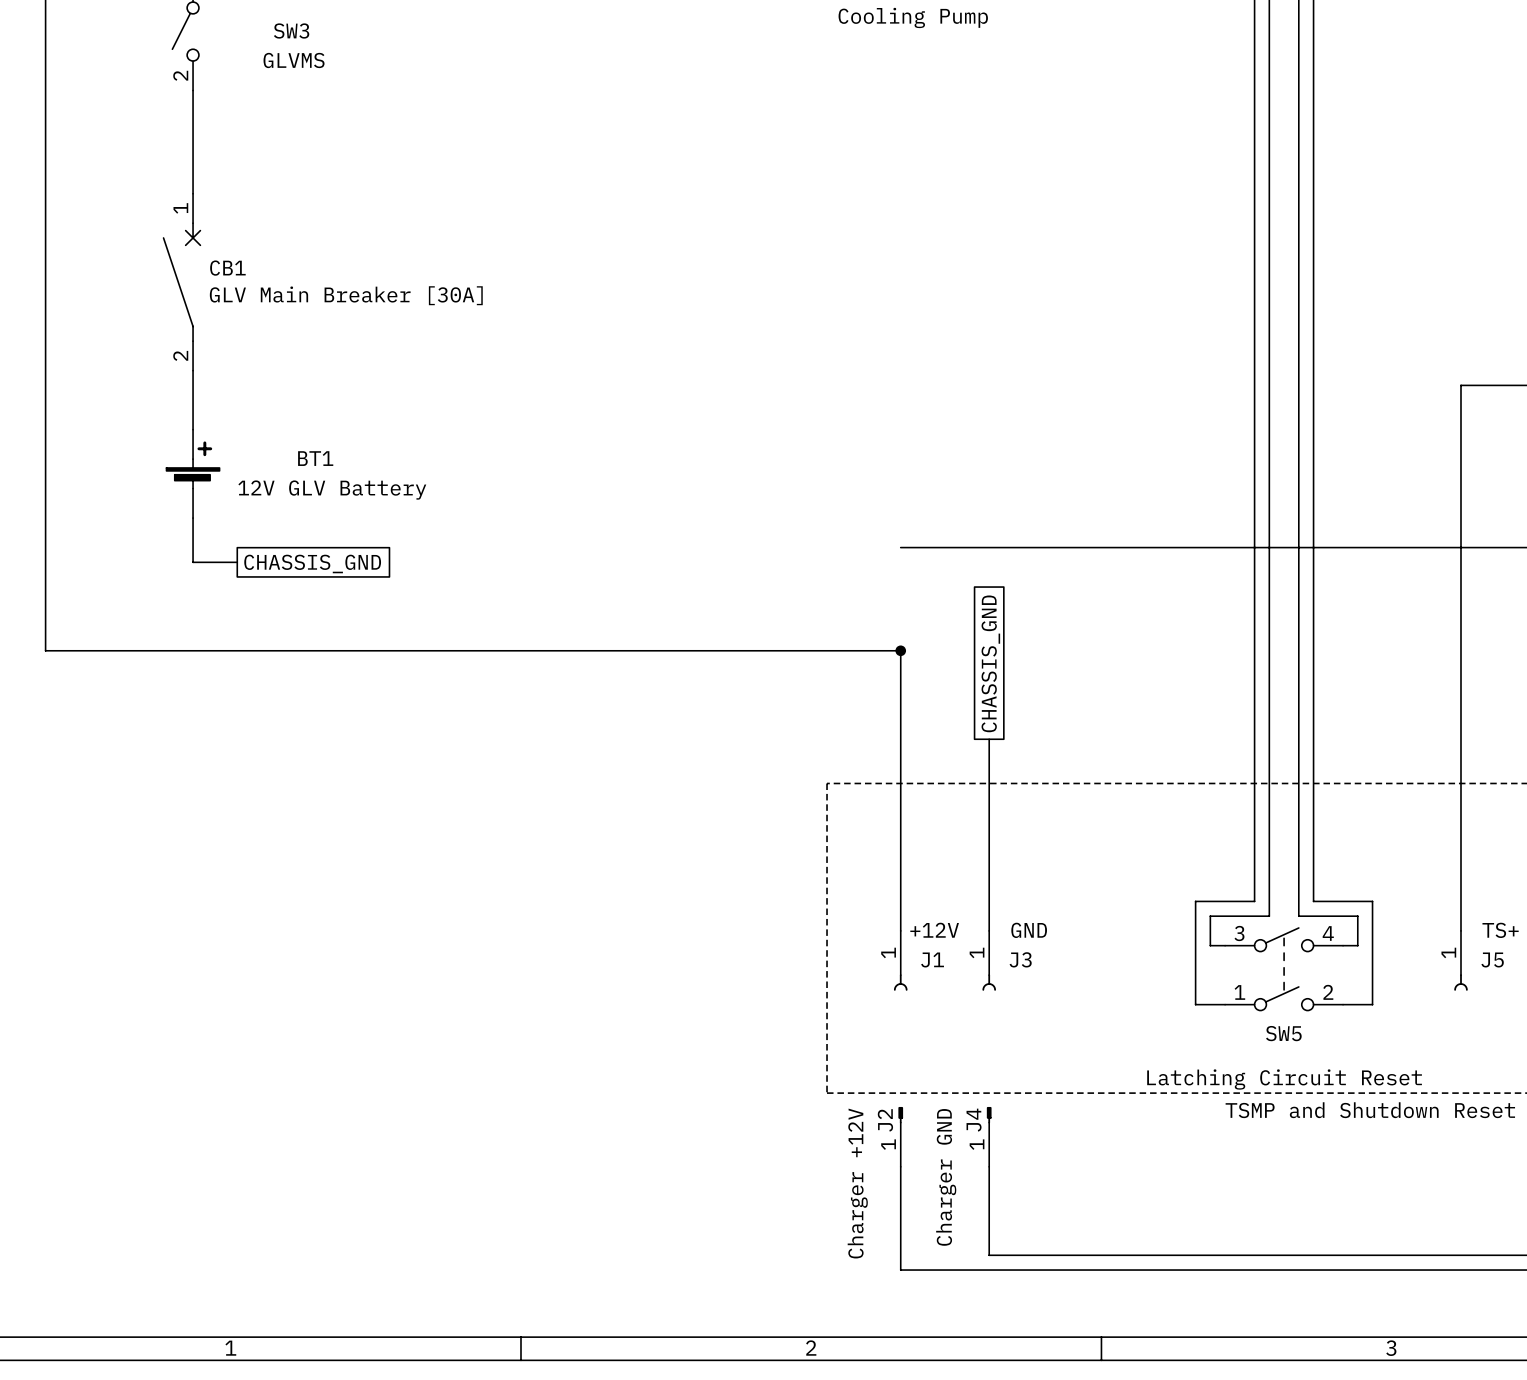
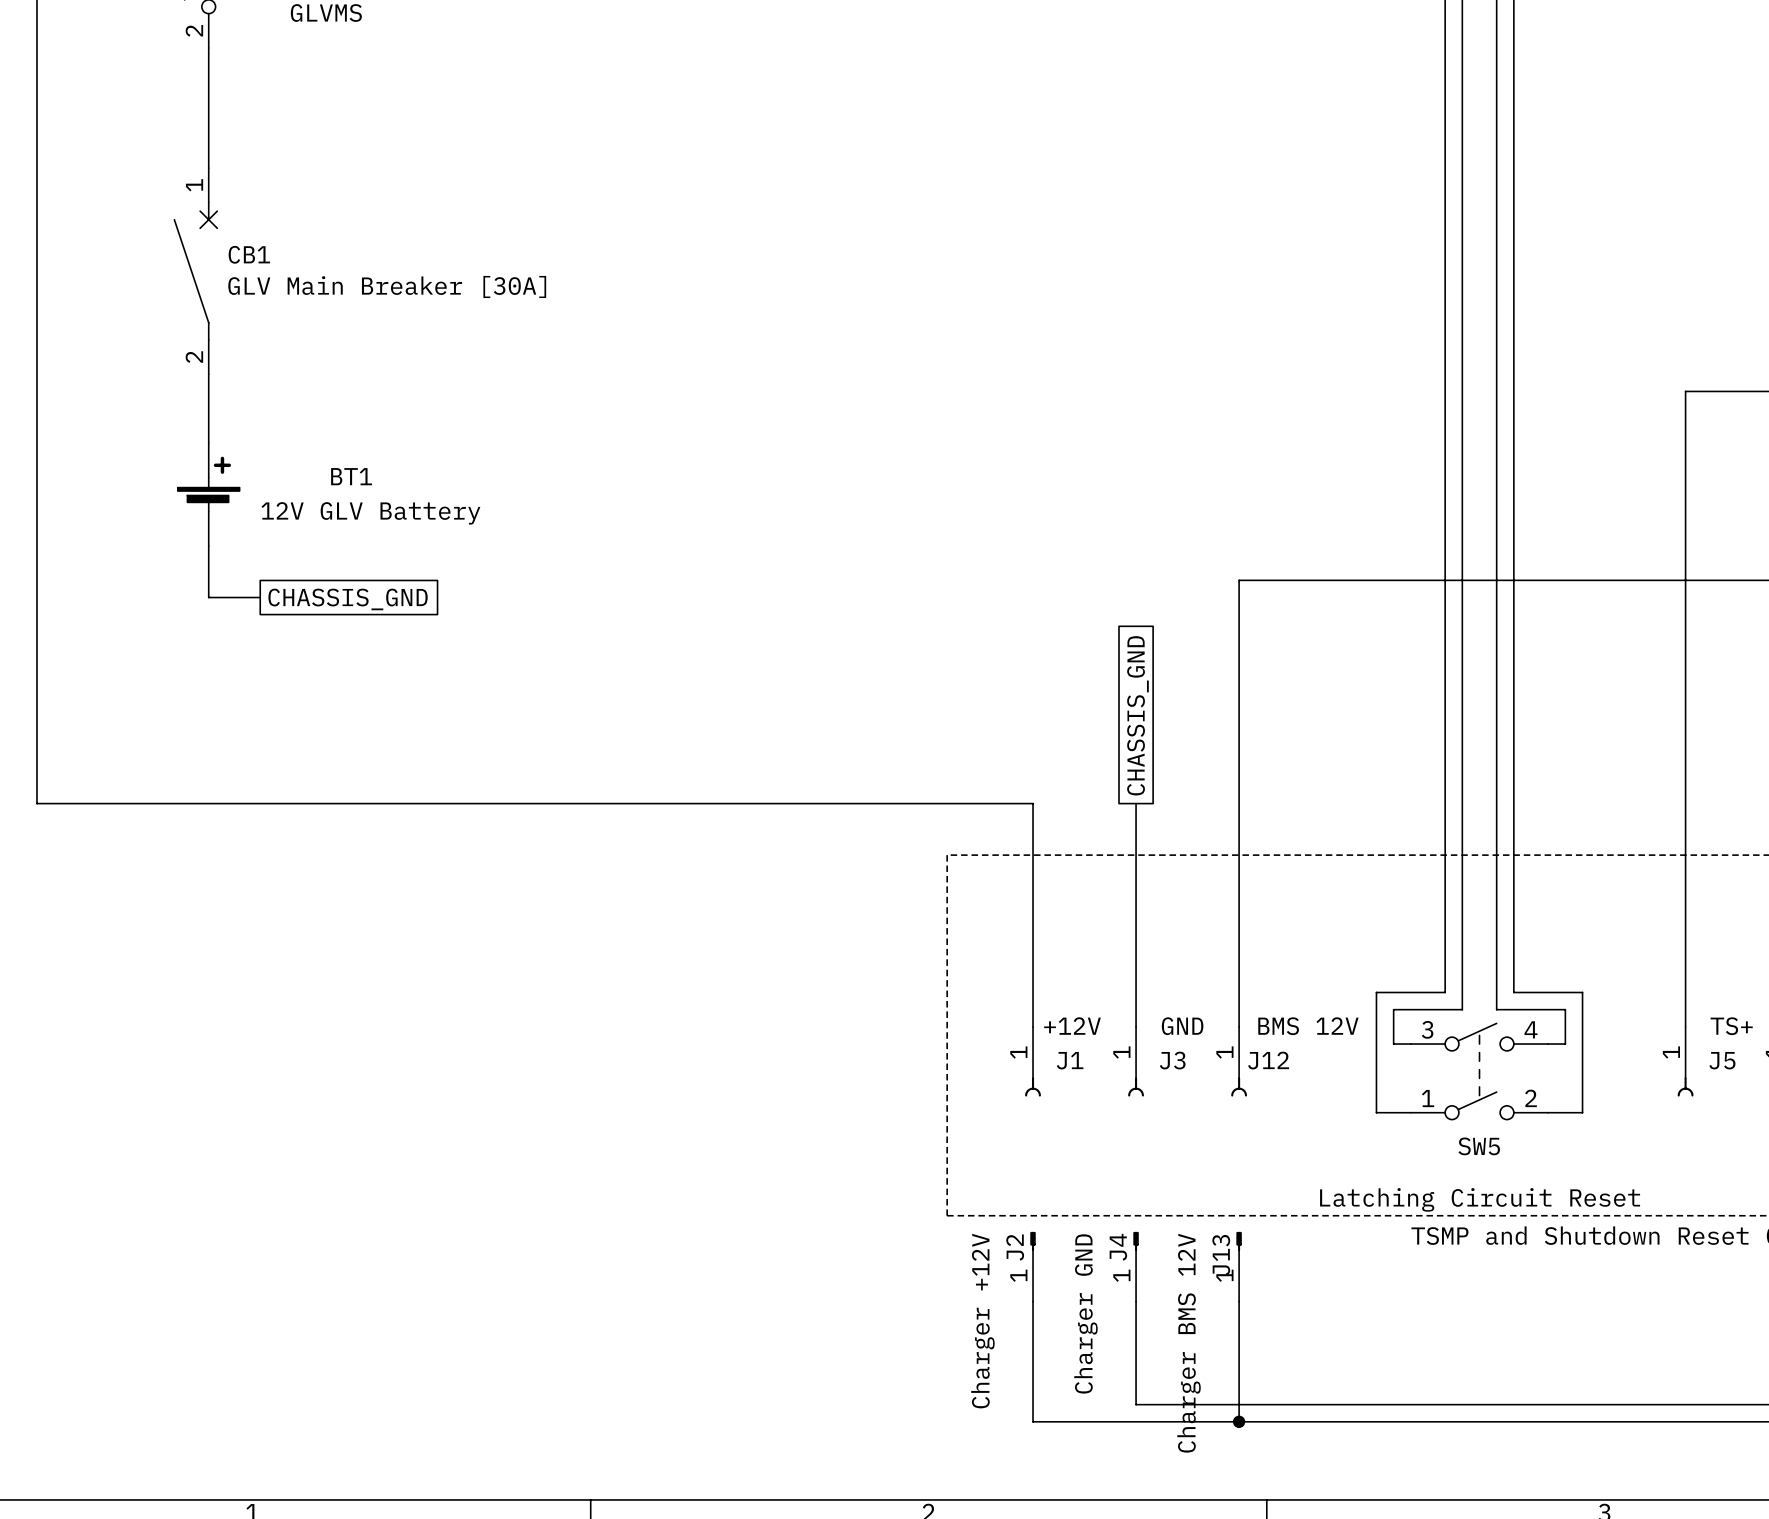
wire: (900, 547) (1077, 547) -> (1239, 1026) (1239, 580)
wire: (45, 650) (900, 650) (900, 739) -> (36, 700) (36, 803) (1033, 803)
junction: (900, 650) -> none
J12: none -> BMS 12V (1239, 1061)
J13: none -> Charger BMS 12V (1239, 1266)
wire: none -> (1239, 1301) (1239, 1421)
junction: none -> (1239, 1421)

